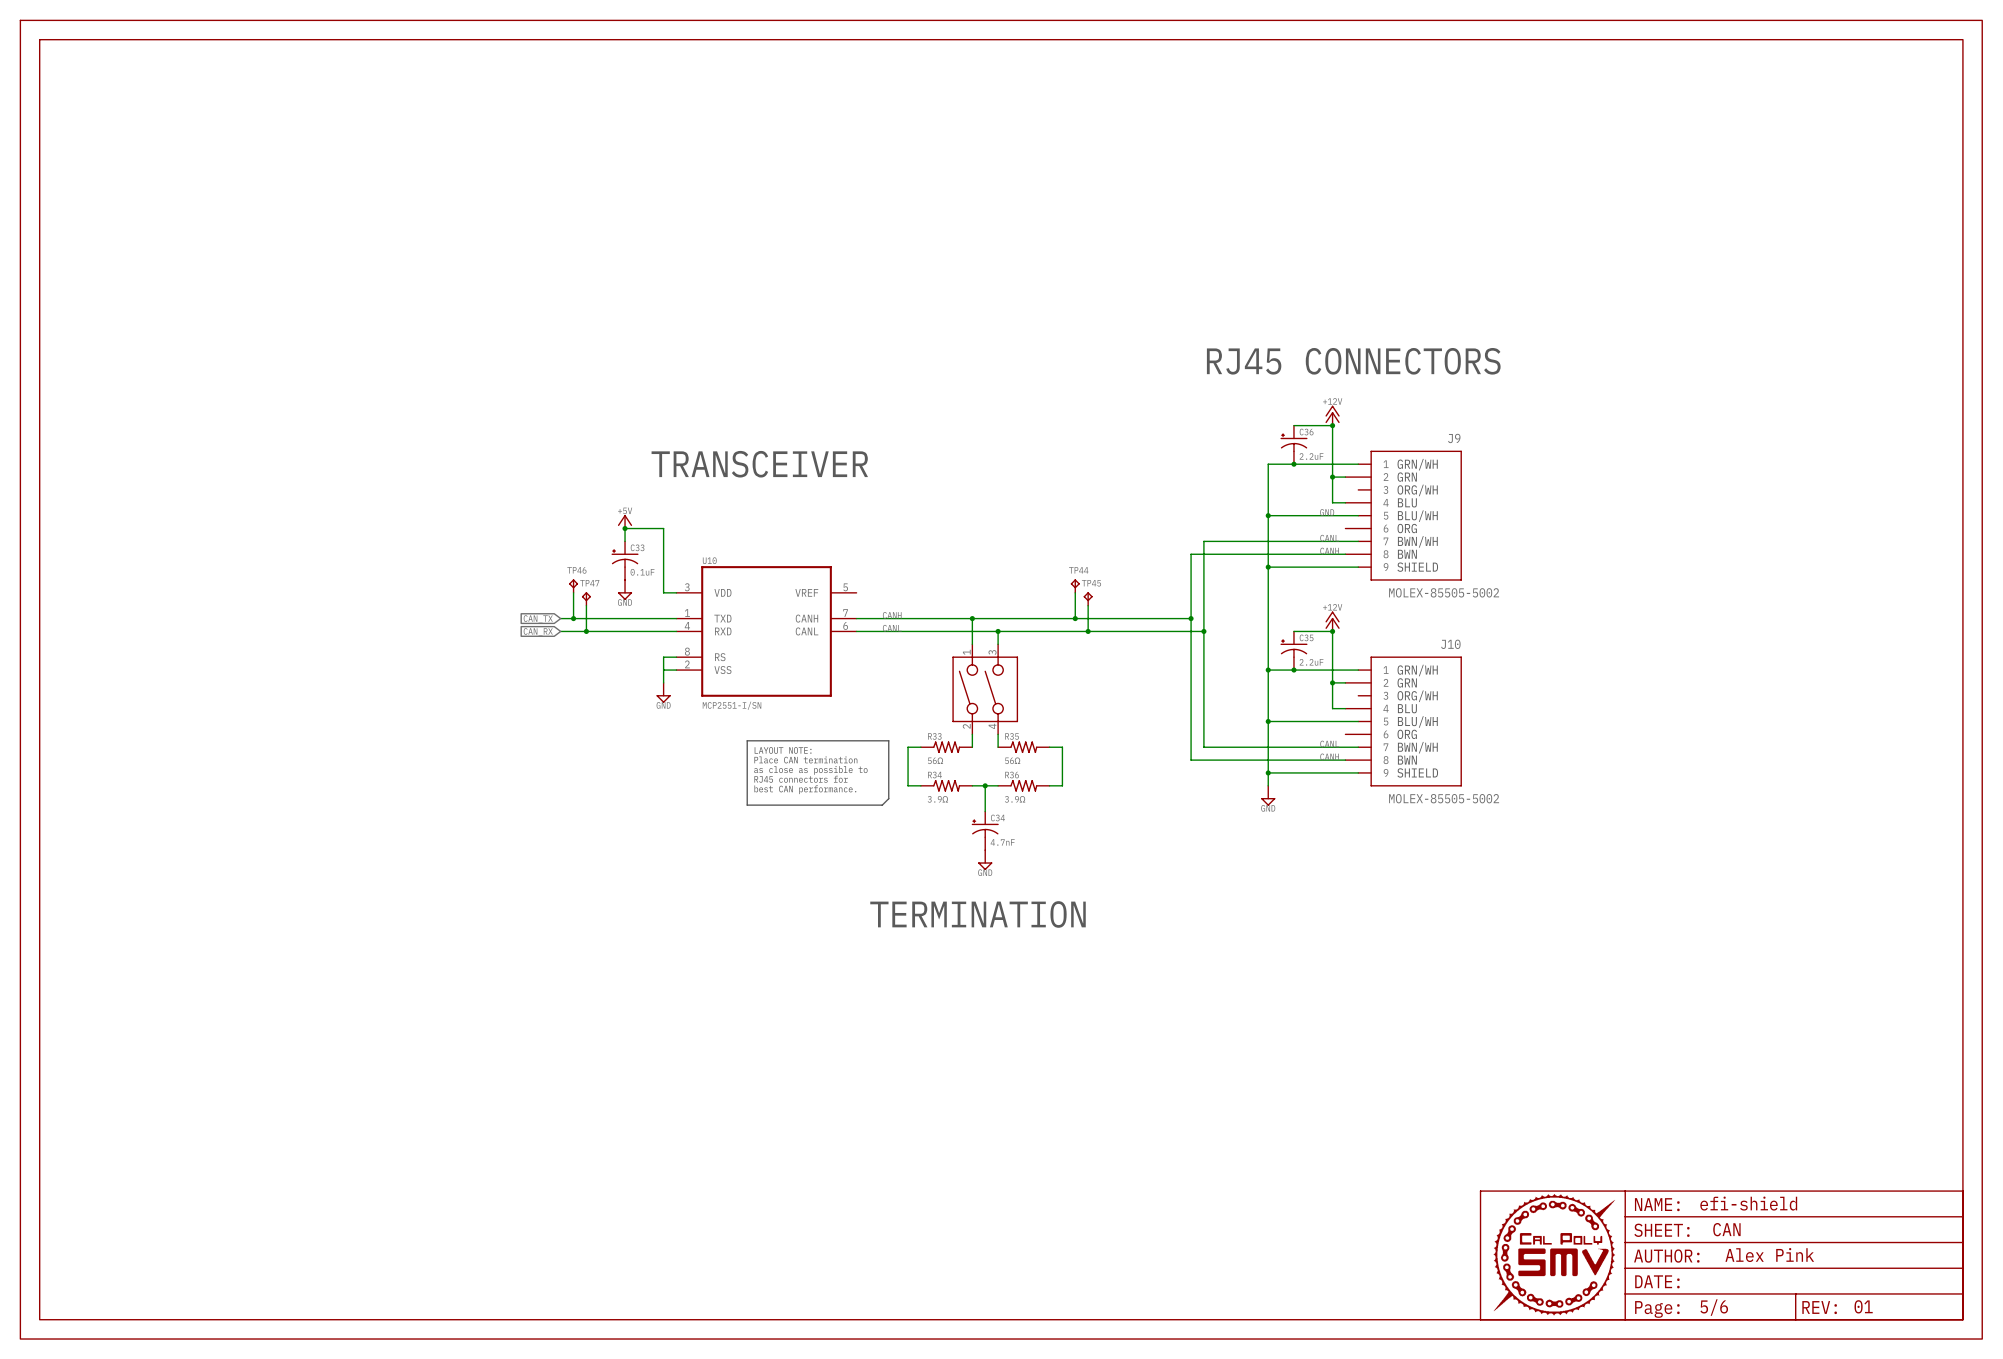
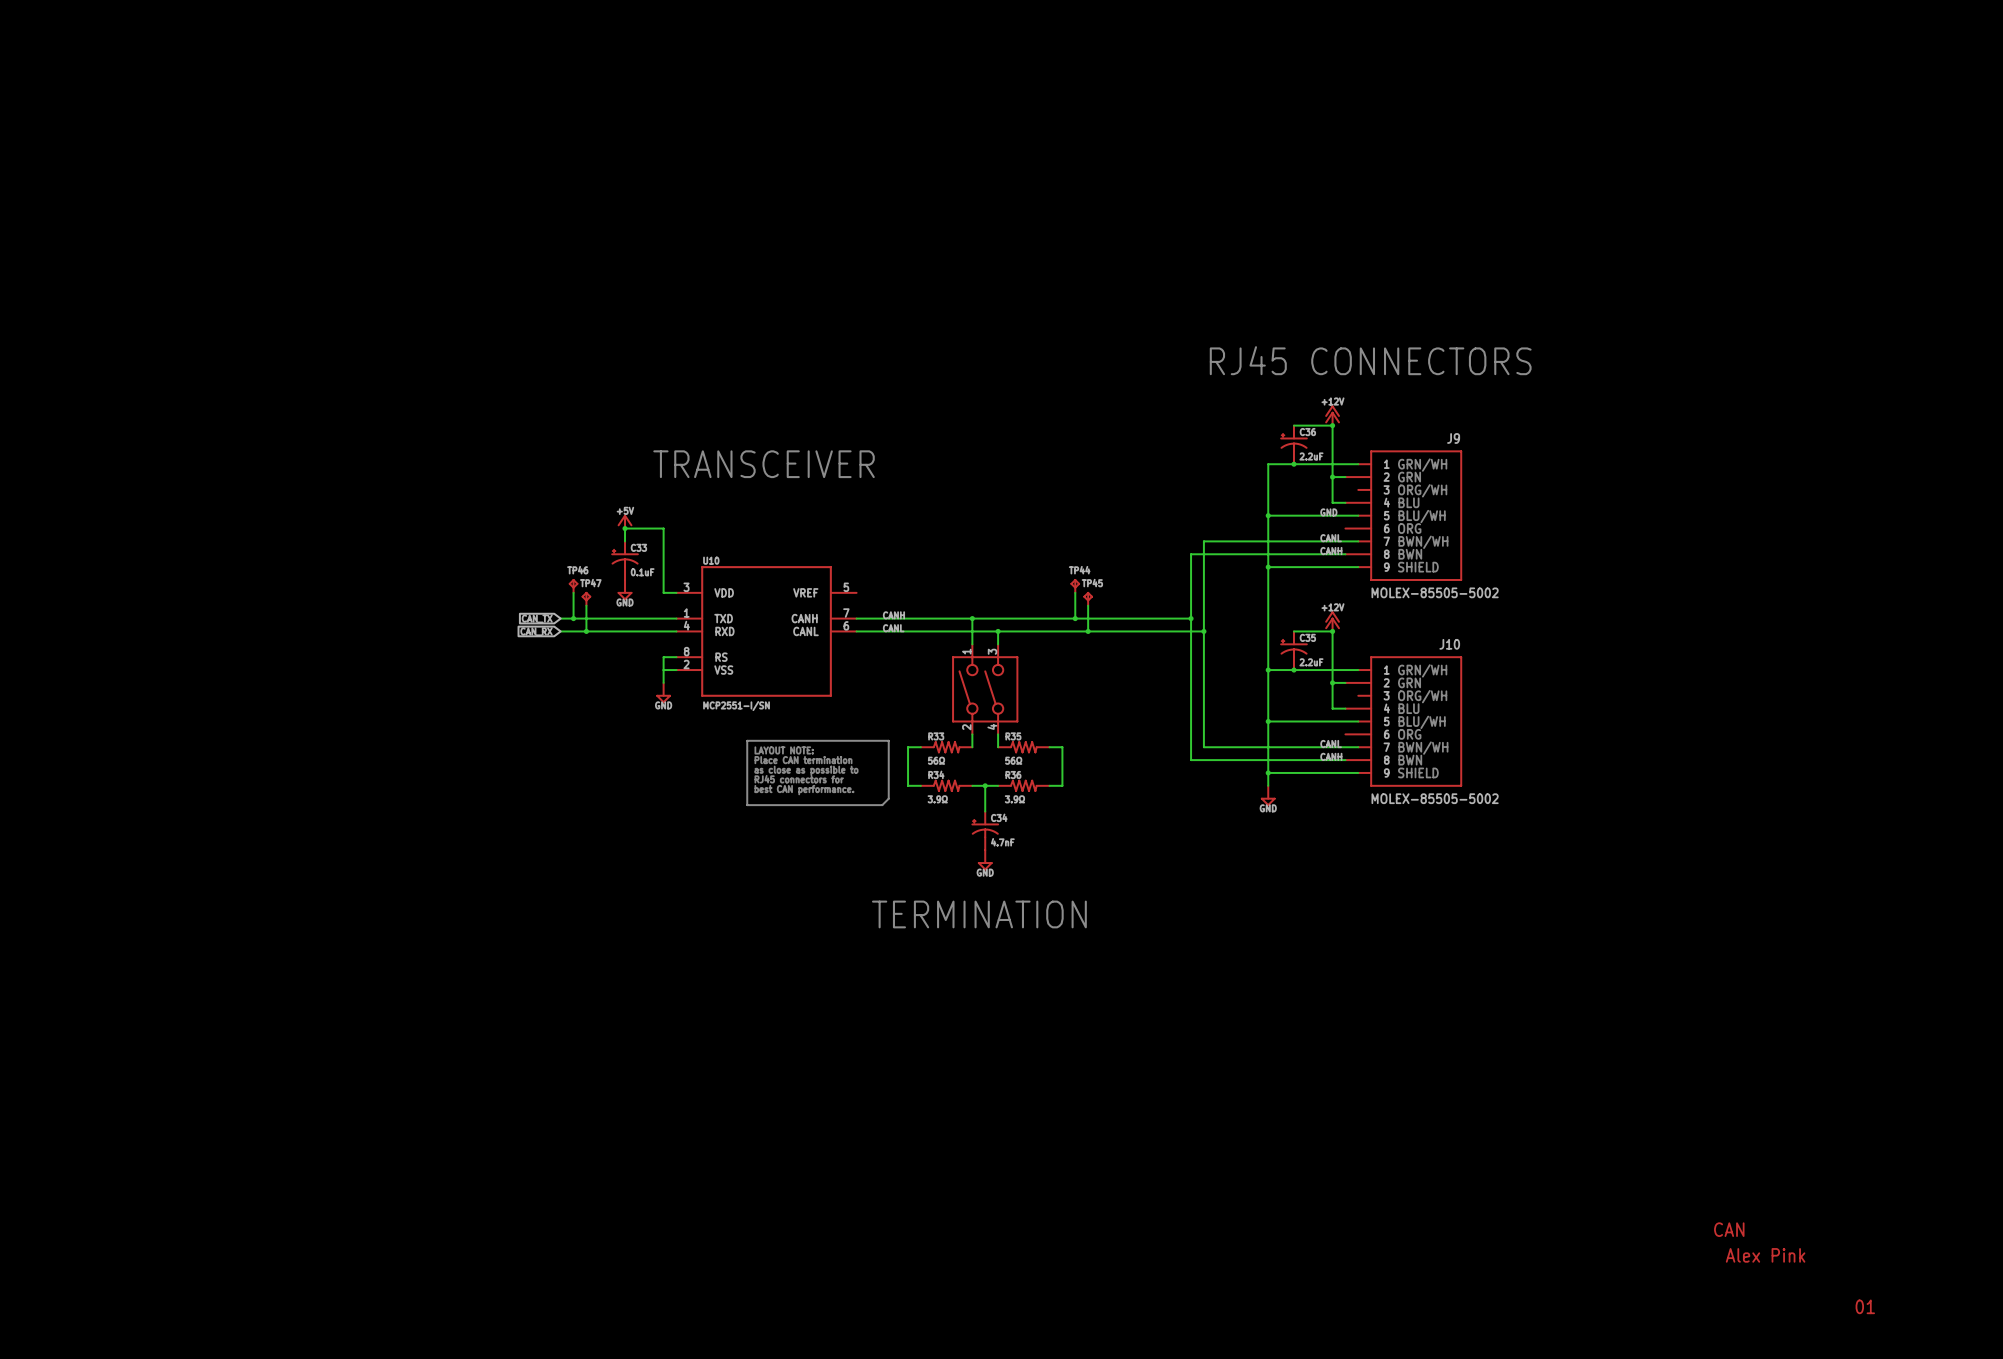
part: (1001, 679) -> none

